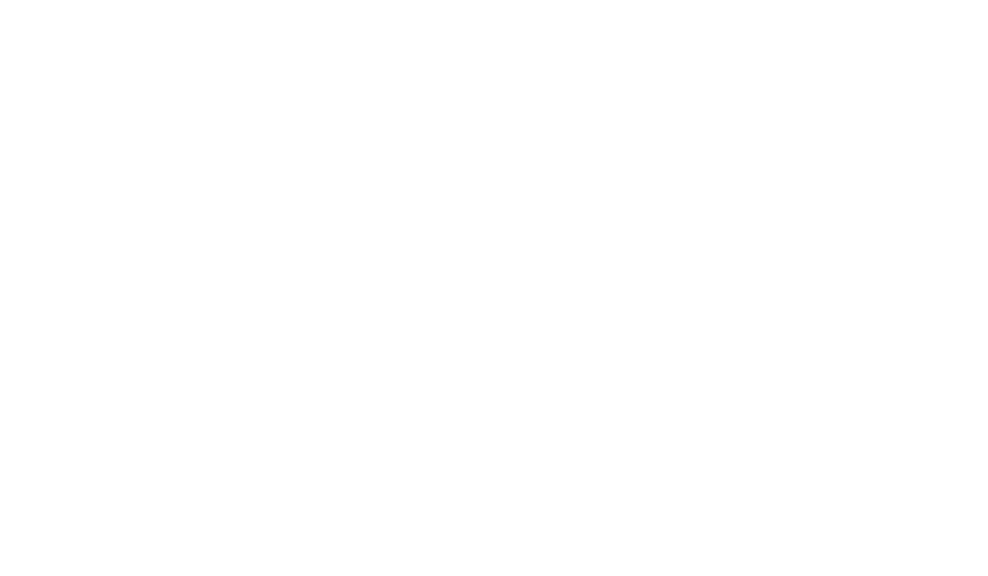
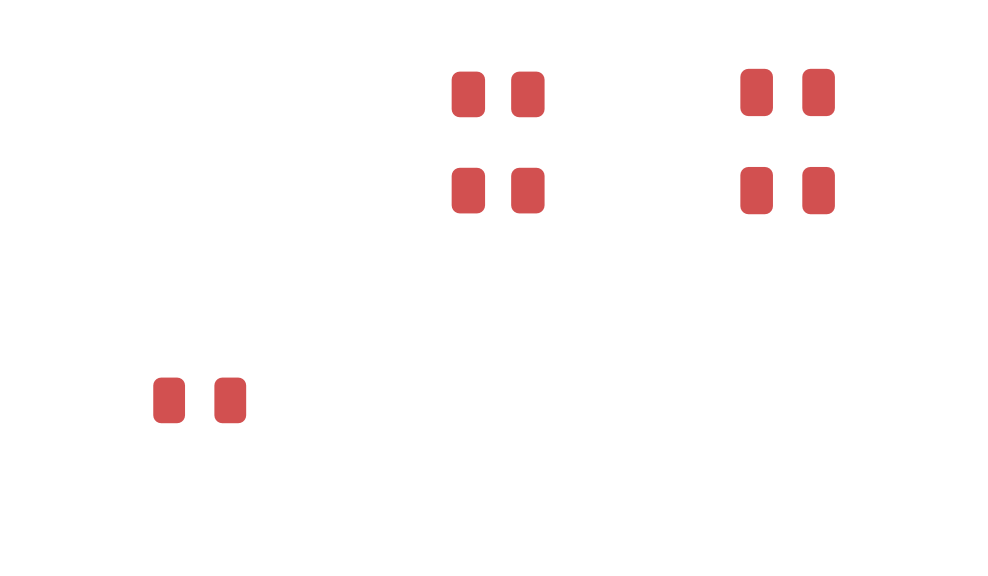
part: none -> (787, 92)
part: none -> (498, 94)
part: none -> (498, 190)
part: none -> (787, 190)
part: none -> (199, 400)

